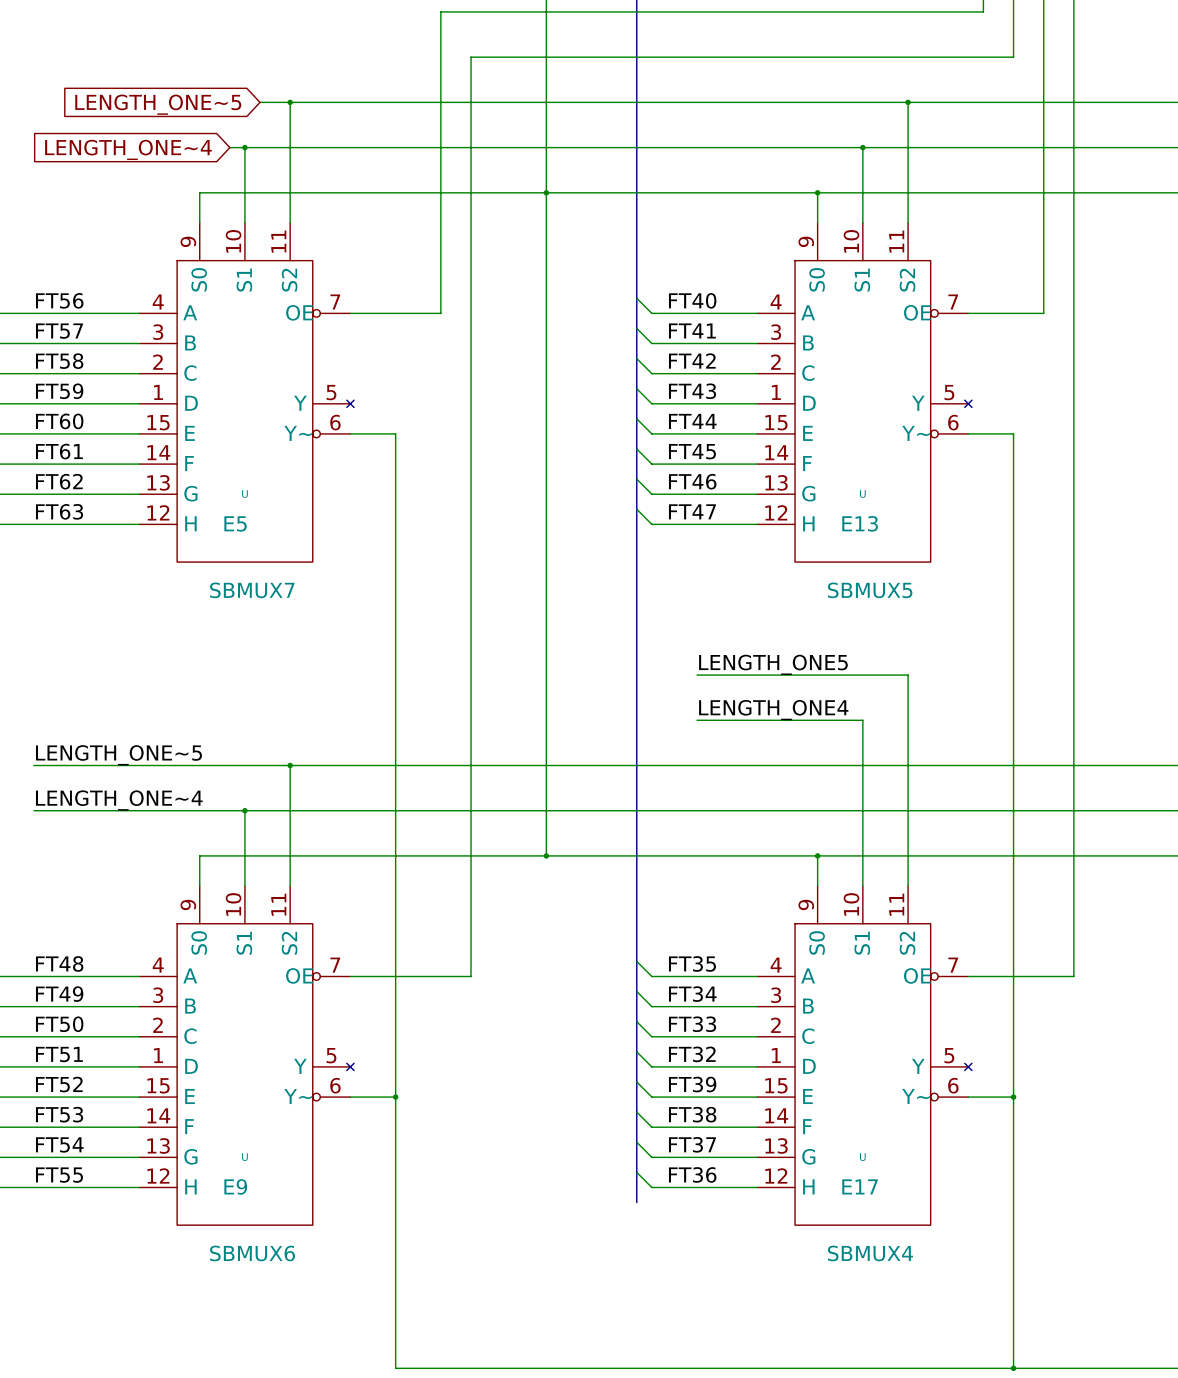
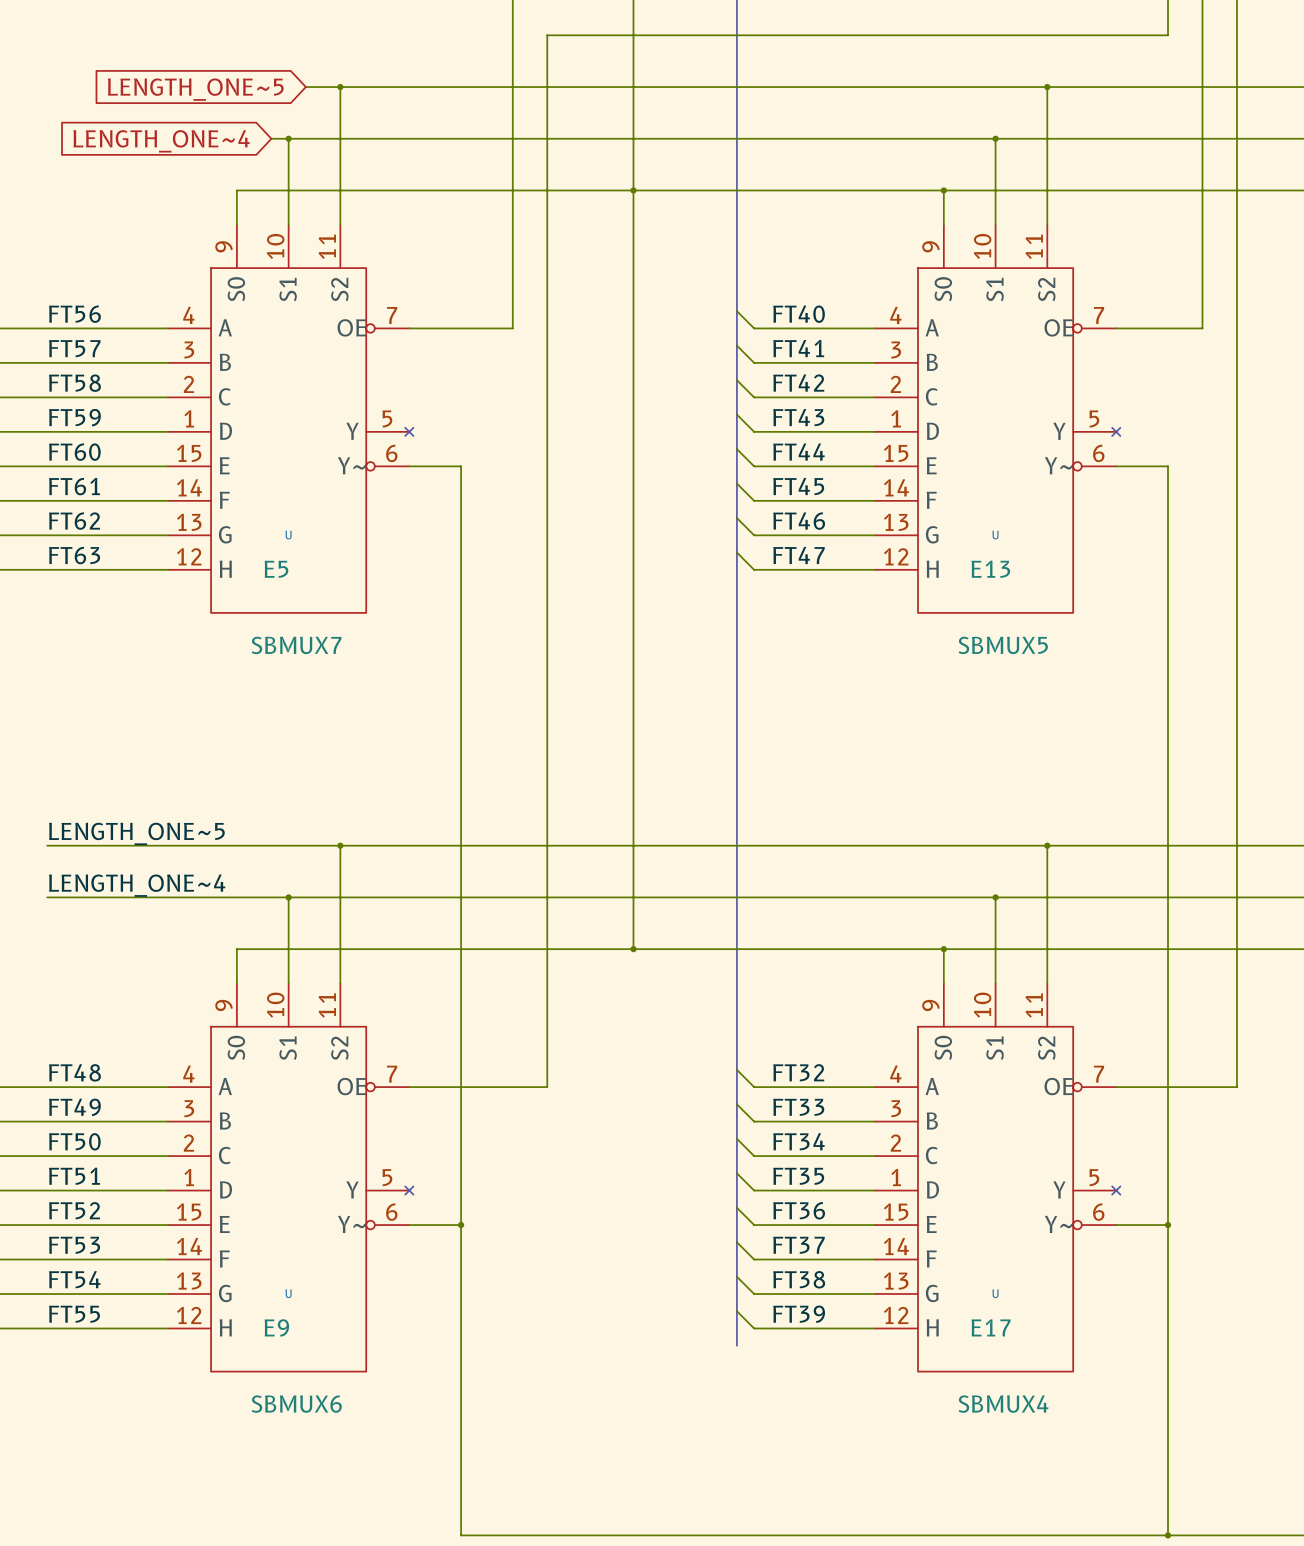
label: LENGTH_ONE5 (773, 664) -> none
wire: (697, 675) (908, 675) (908, 765) -> none
label: LENGTH_ONE4 (773, 710) -> none
wire: (697, 720) (862, 720) (862, 810) -> none
junction: none -> (1047, 845)
junction: none -> (995, 897)
label: FT35 (692, 963) -> FT32 (798, 1072)
label: FT34 (692, 994) -> FT33 (798, 1107)
label: FT33 (692, 1024) -> FT34 (798, 1141)
label: FT32 (692, 1054) -> FT35 (798, 1176)
label: FT39 (692, 1084) -> FT36 (799, 1210)
label: FT38 (692, 1114) -> FT37 (798, 1245)
label: FT37 (692, 1144) -> FT38 (799, 1279)
label: FT36 (692, 1174) -> FT39 (799, 1314)

